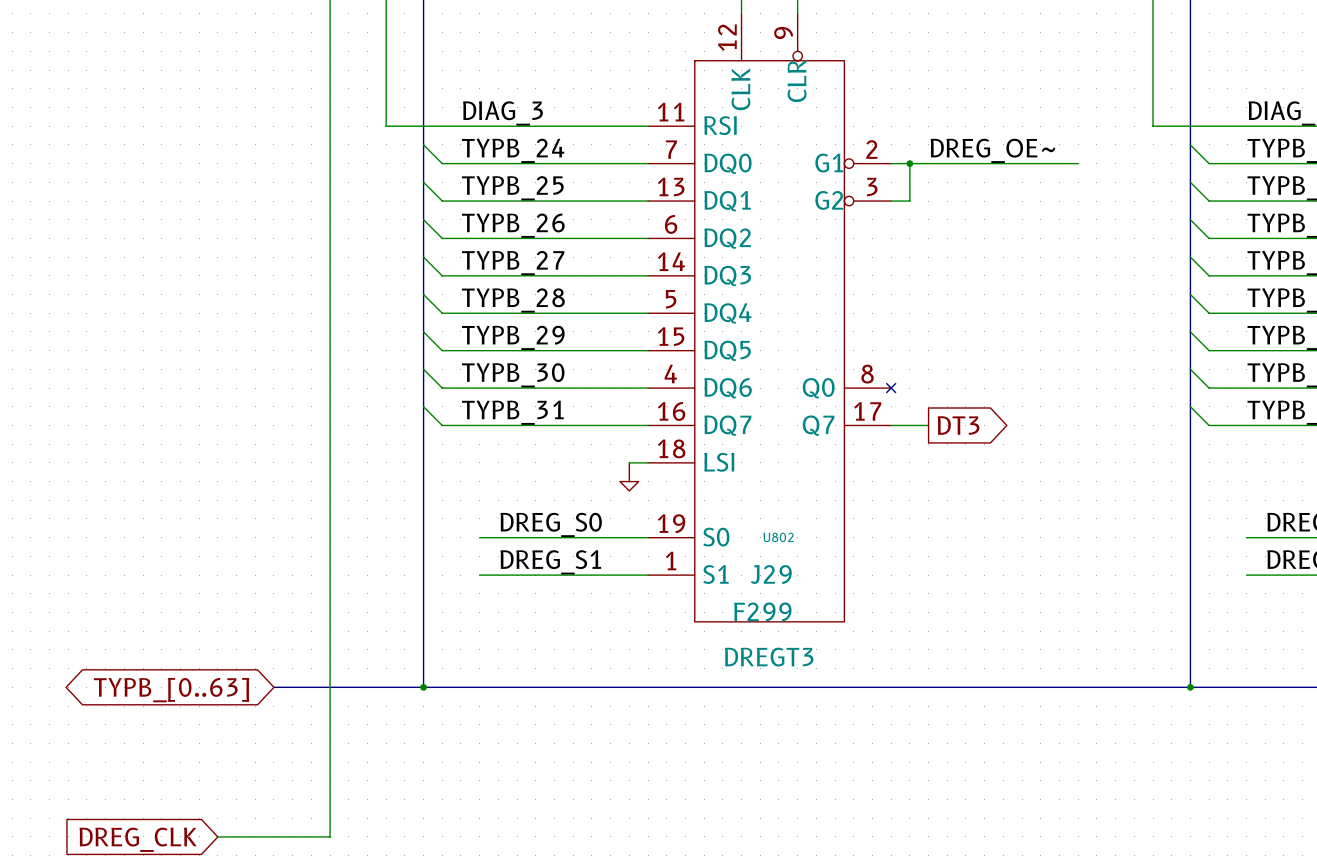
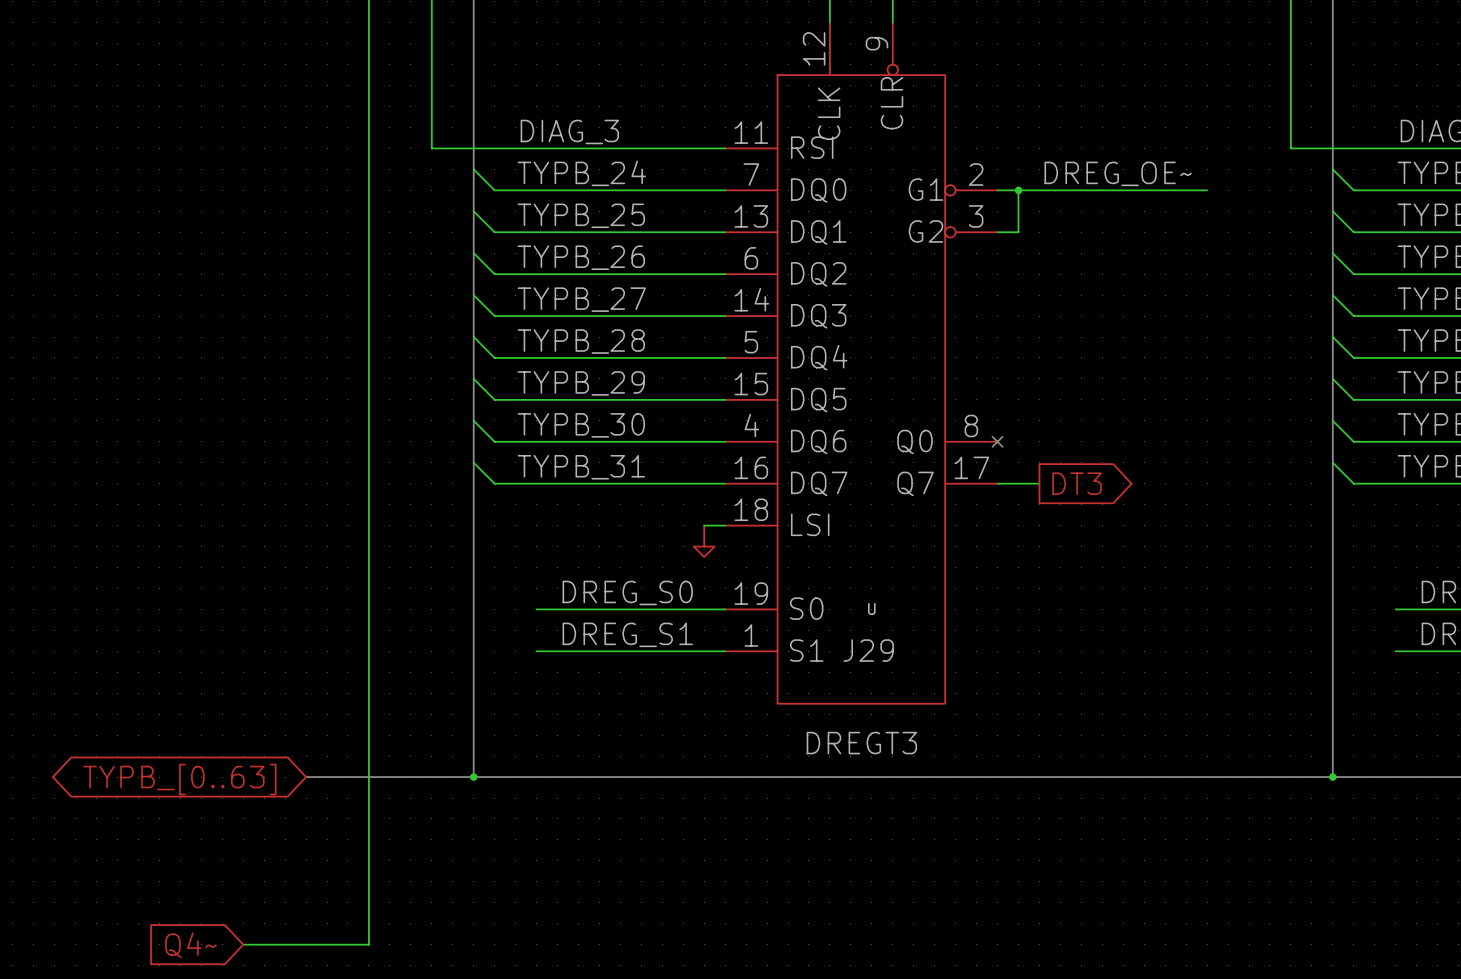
U802 name: U802 (778, 537) -> U (871, 609)
U802 value: F299 (762, 611) -> none
global label: DREG_CLK (138, 839) -> Q4~ (190, 945)

